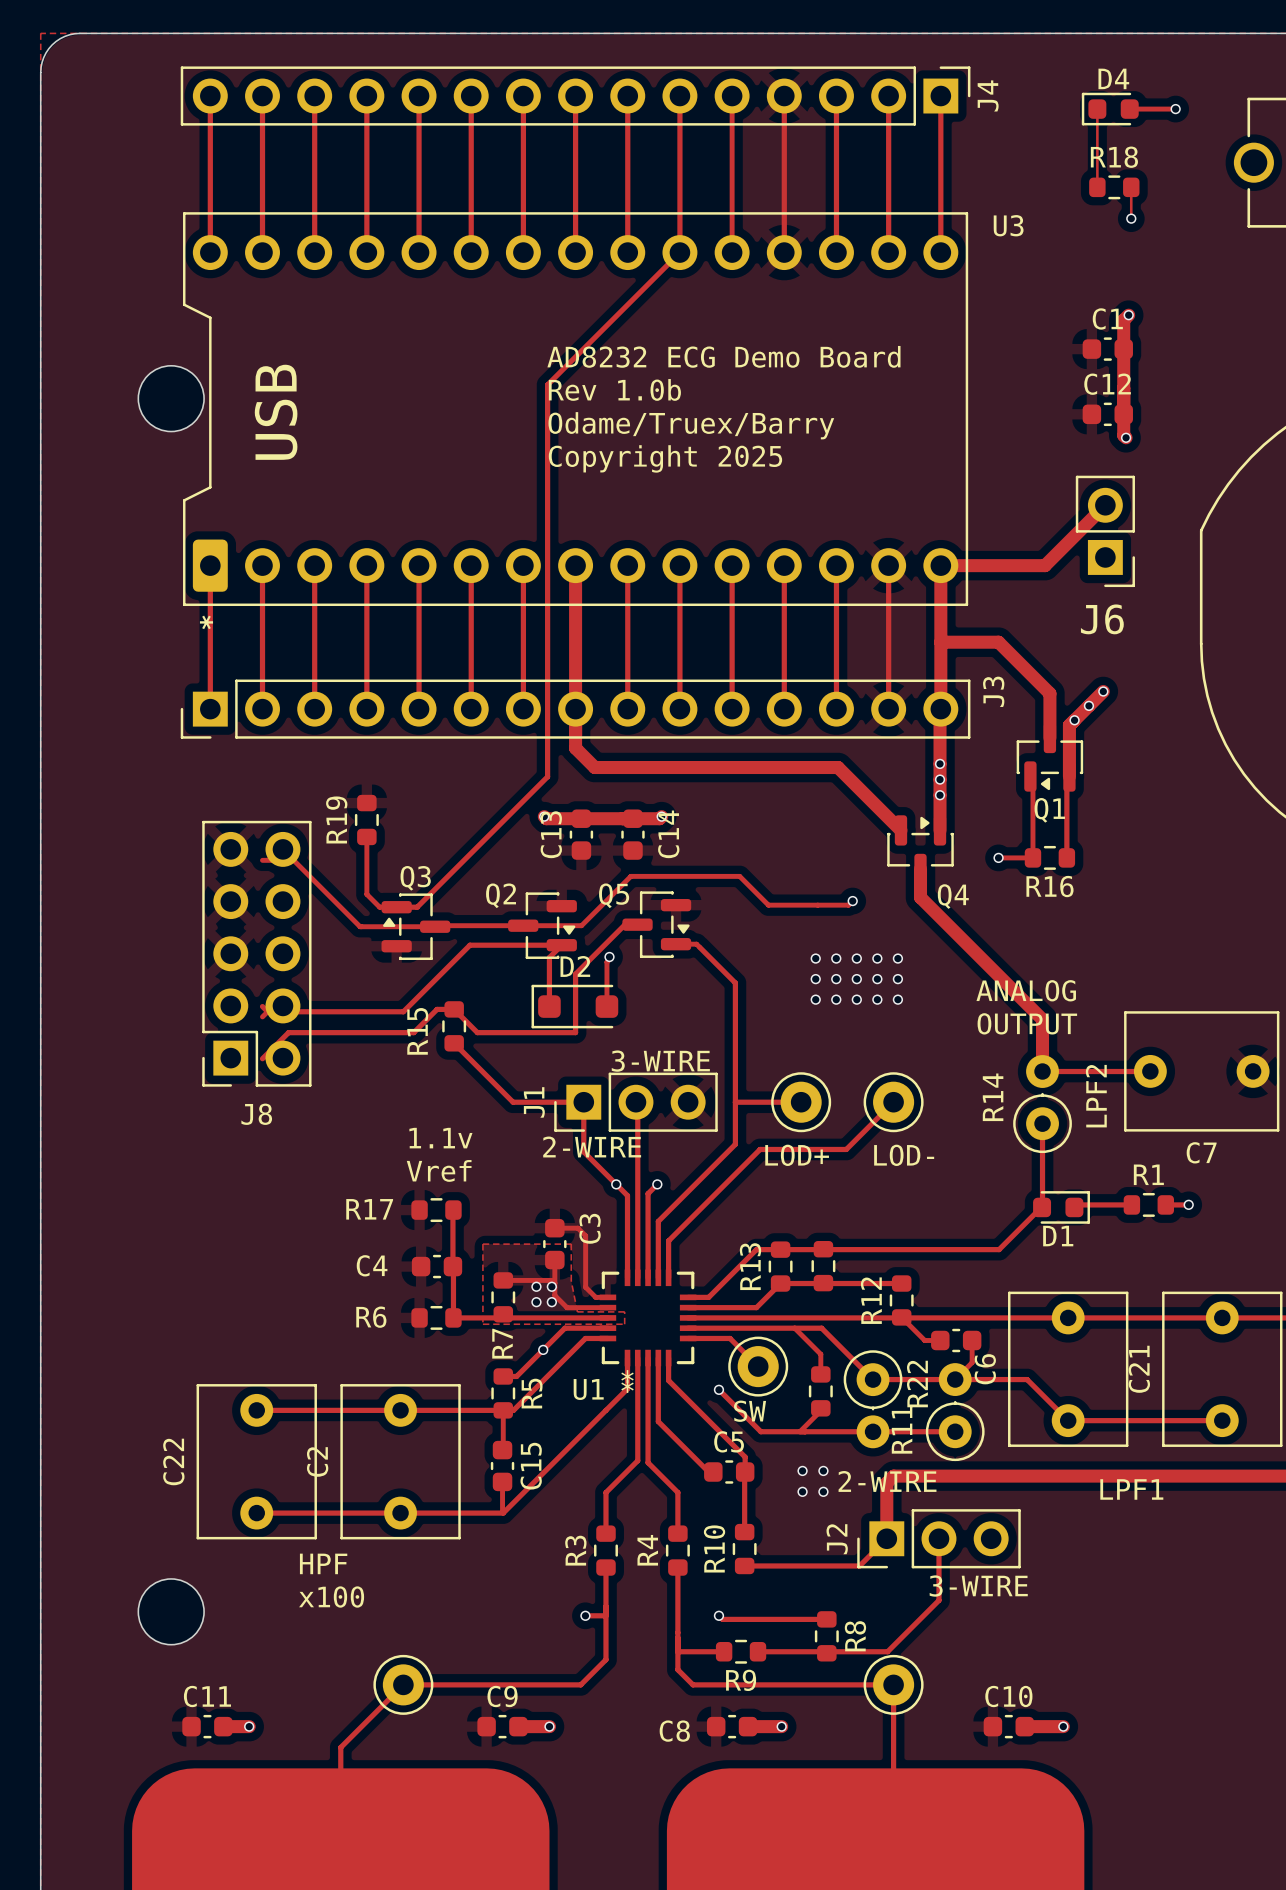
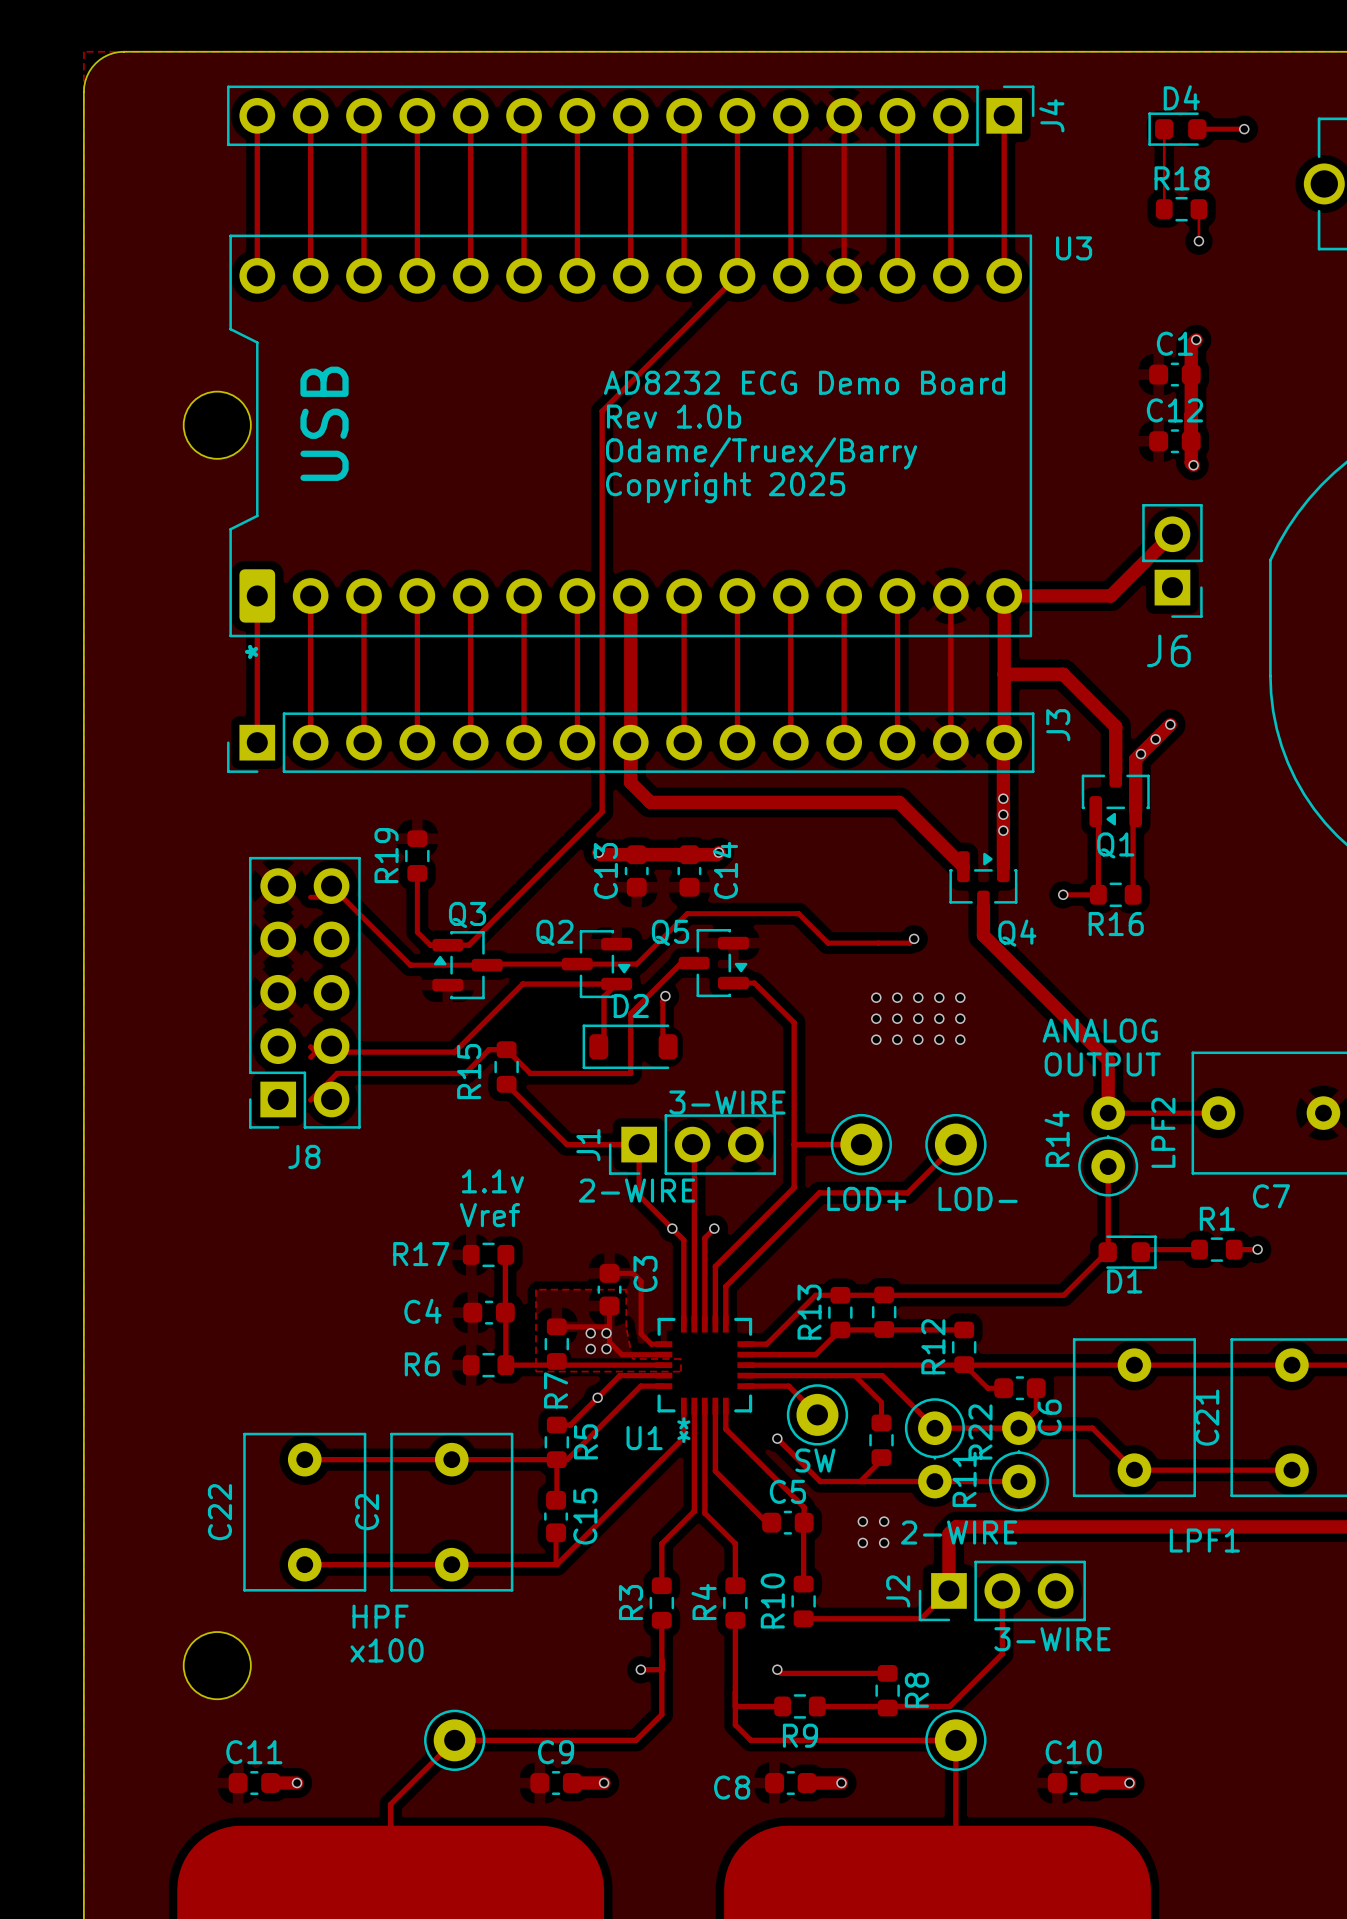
D2 footprint: [531, 984, 619, 1029] -> [582, 1024, 678, 1070]

